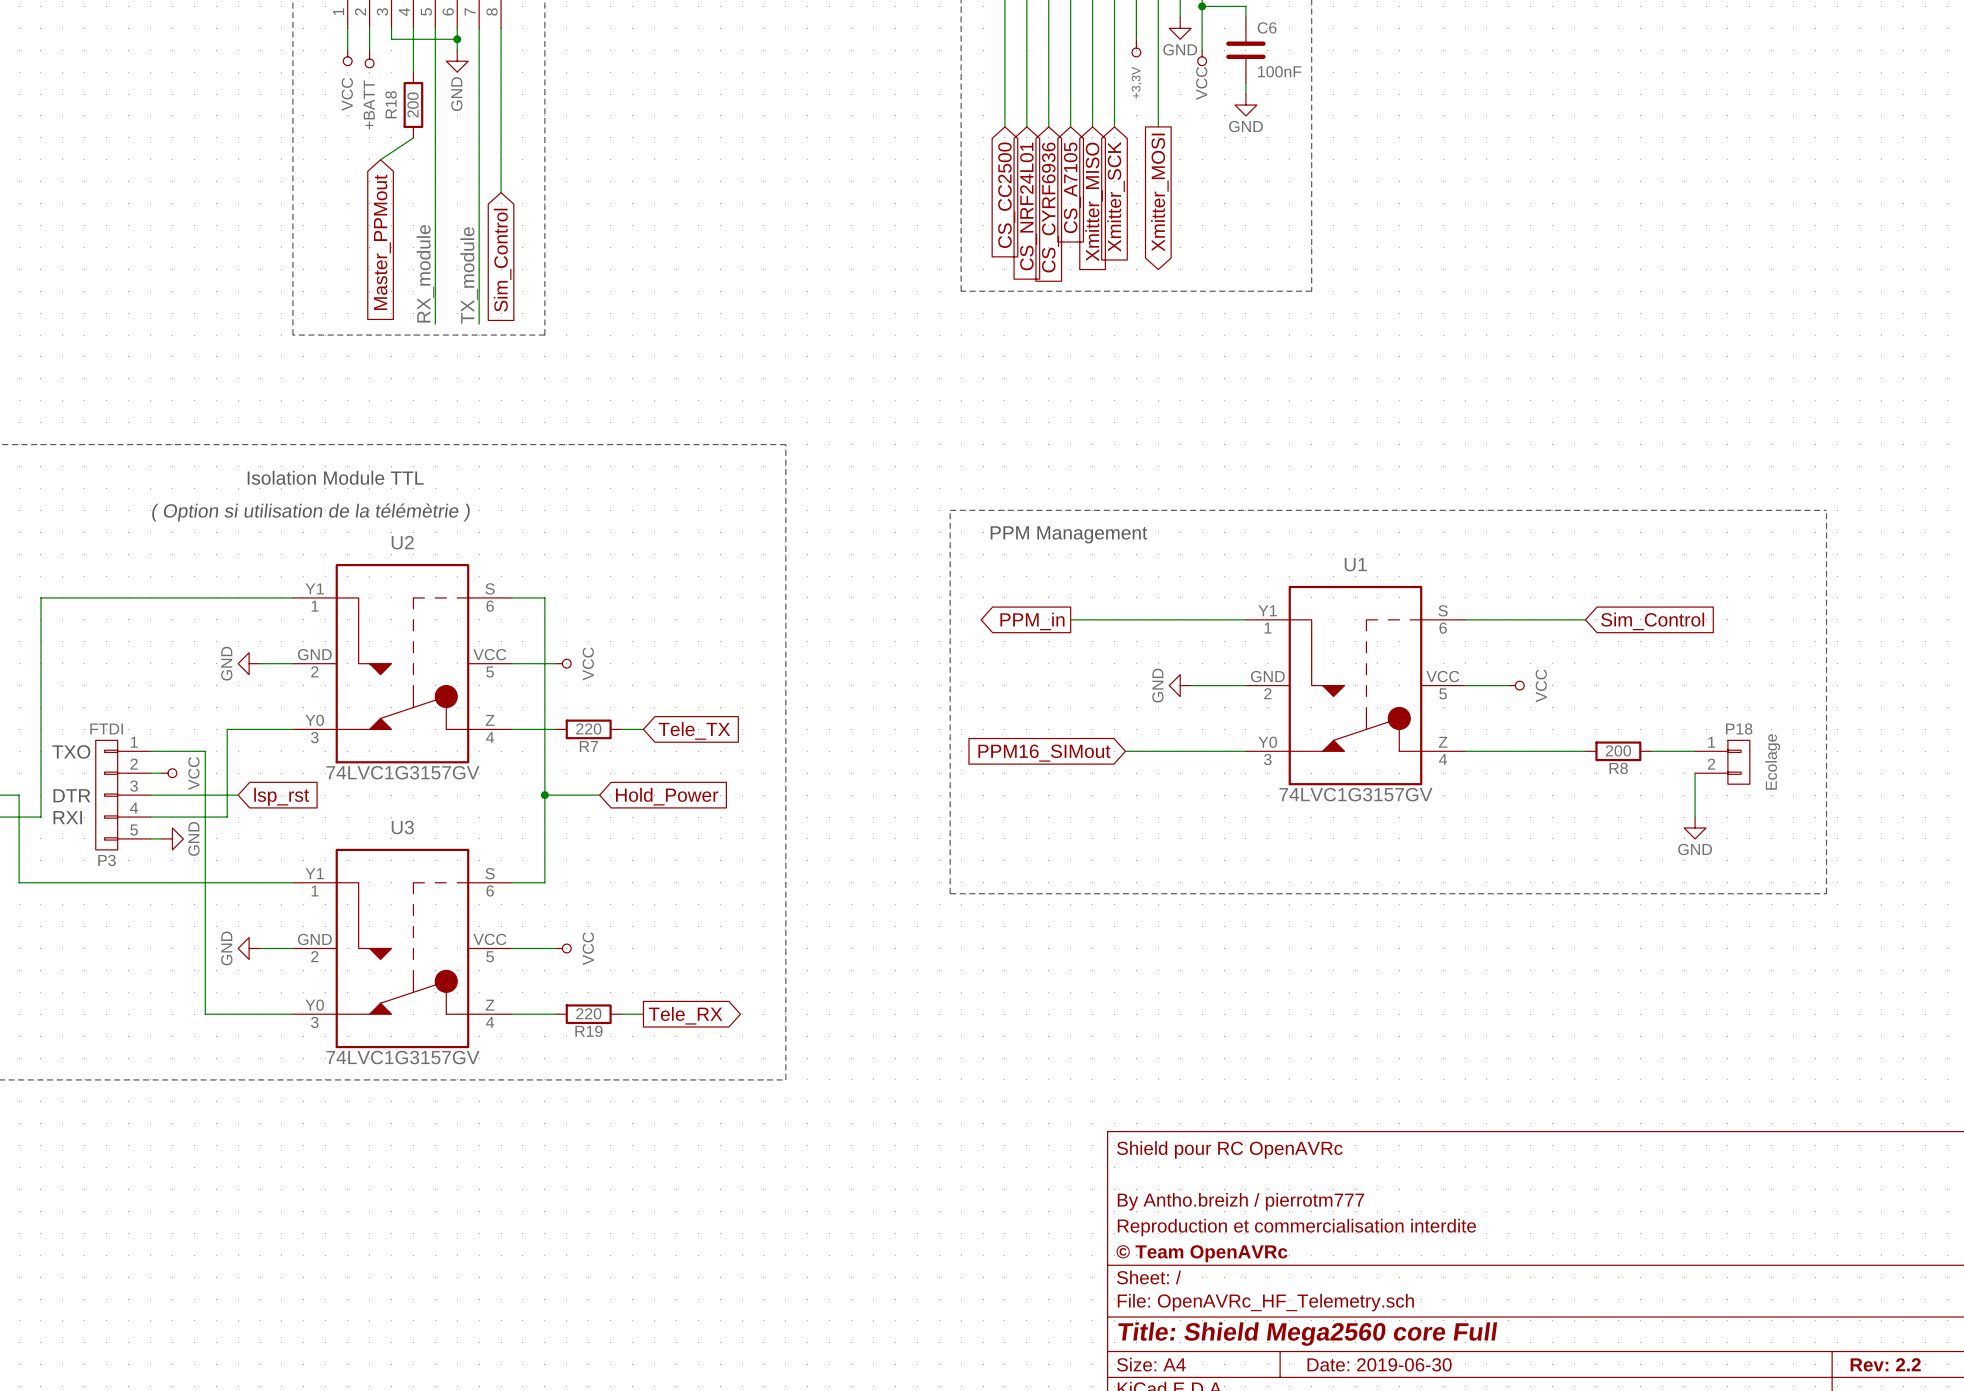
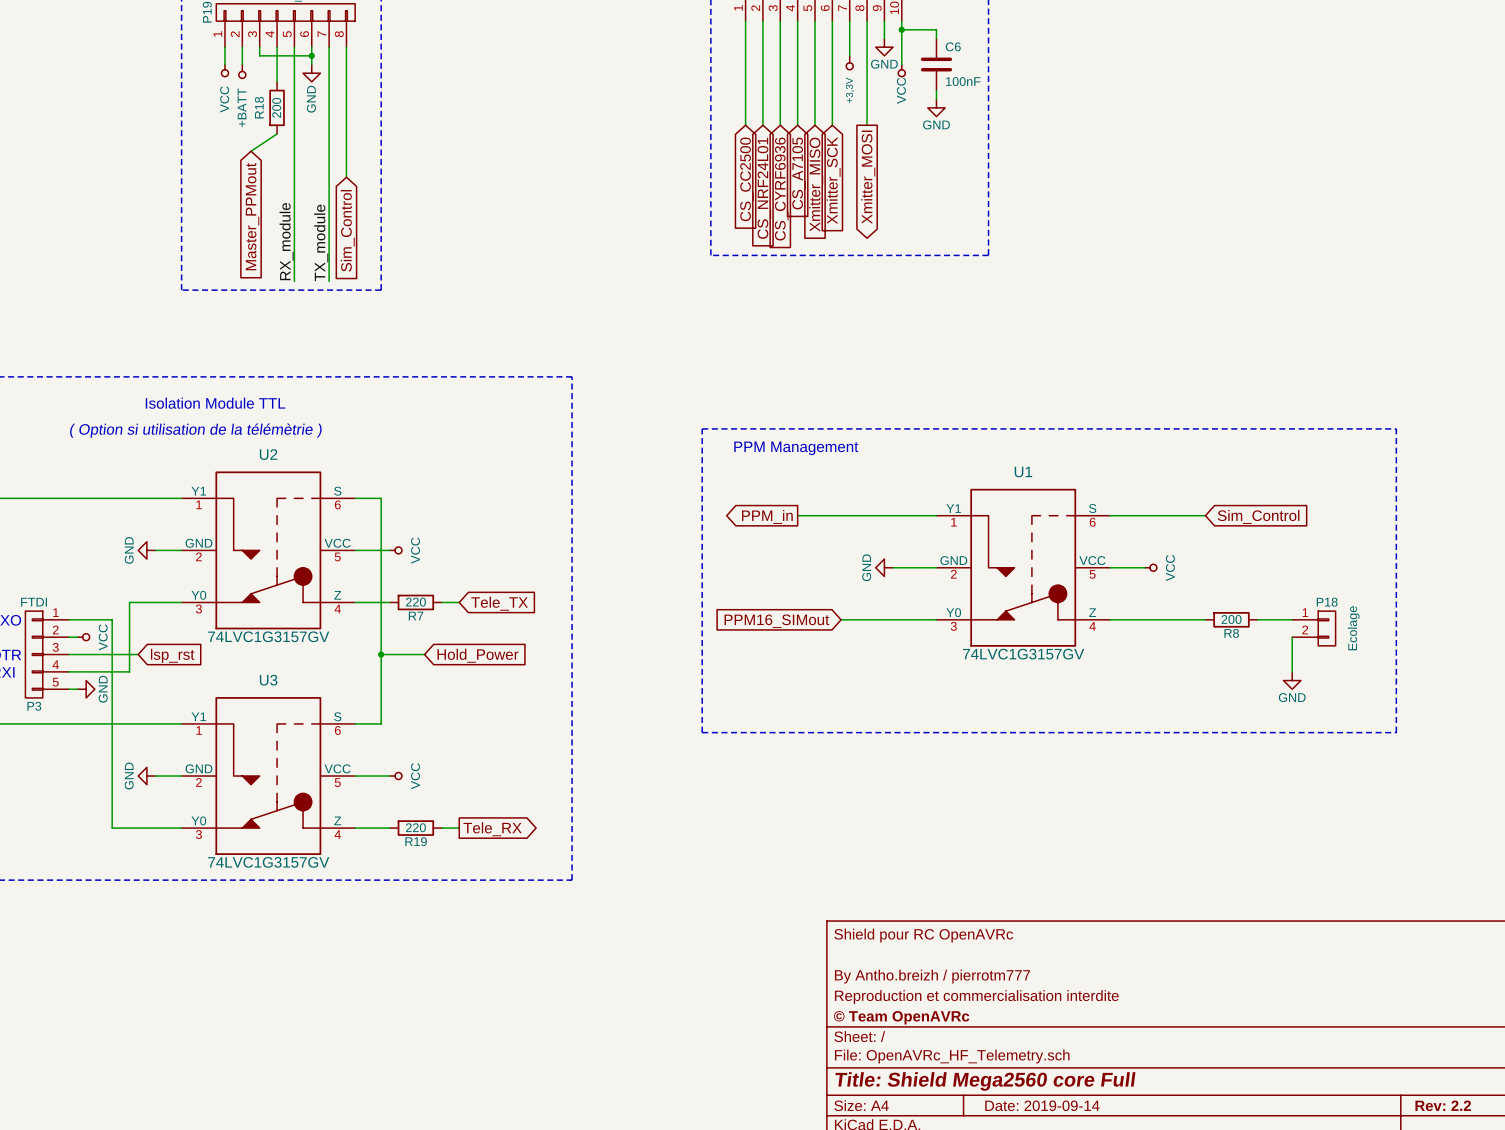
title block: Date: 2019-06-30 (1379, 1364) -> Date: 2019-09-14 (1042, 1105)

